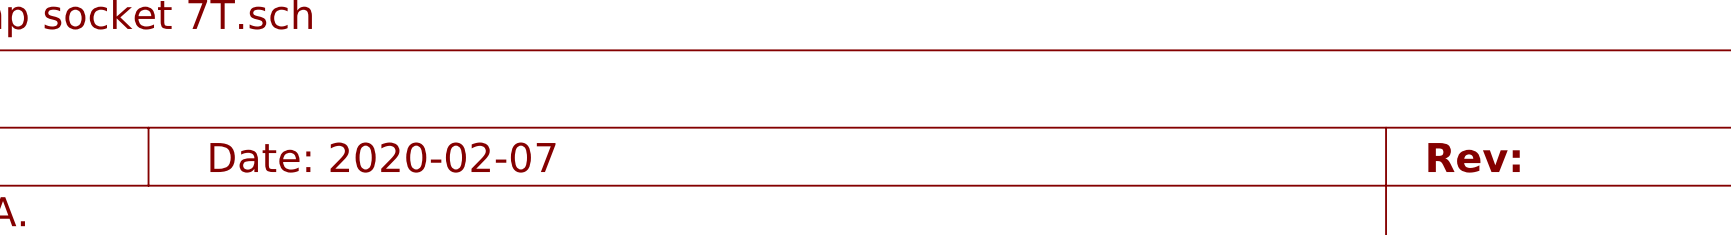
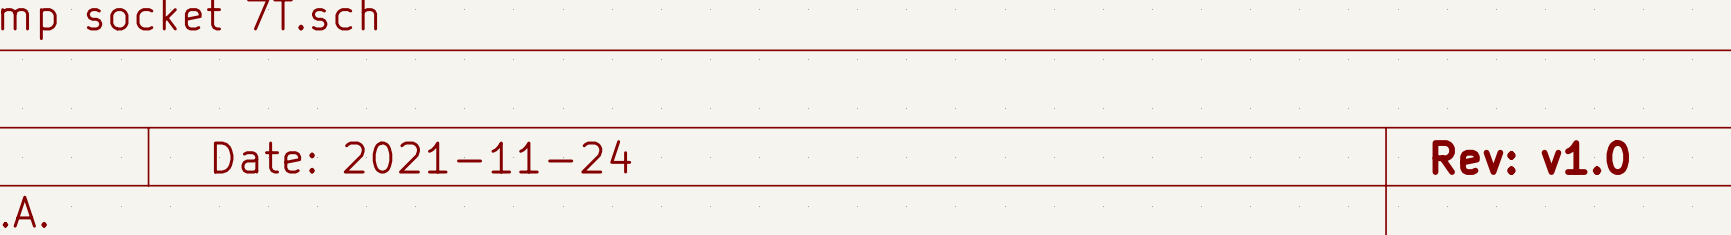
title block: Date: 2020-02-07 (382, 157) -> Date: 2021-11-24 (422, 156)
title block: Rev: (1474, 157) -> Rev: v1.0 (1530, 157)

